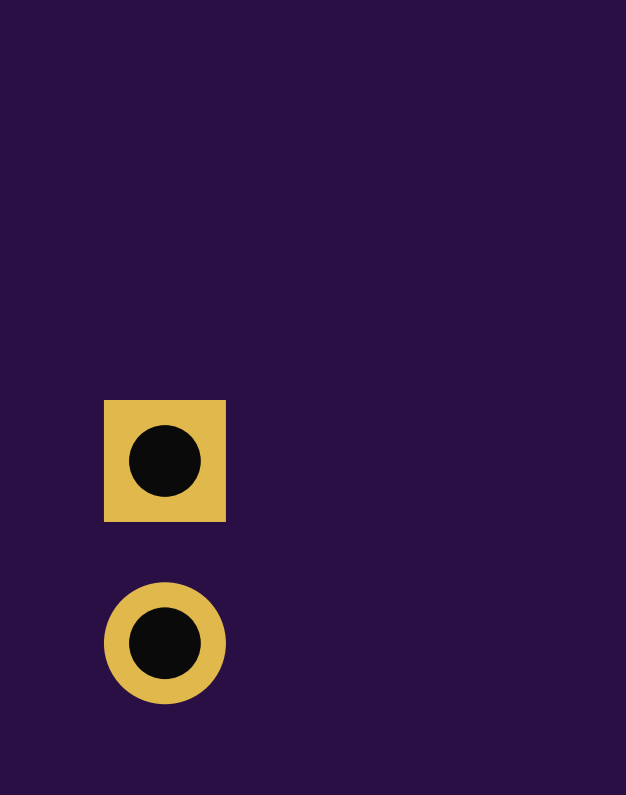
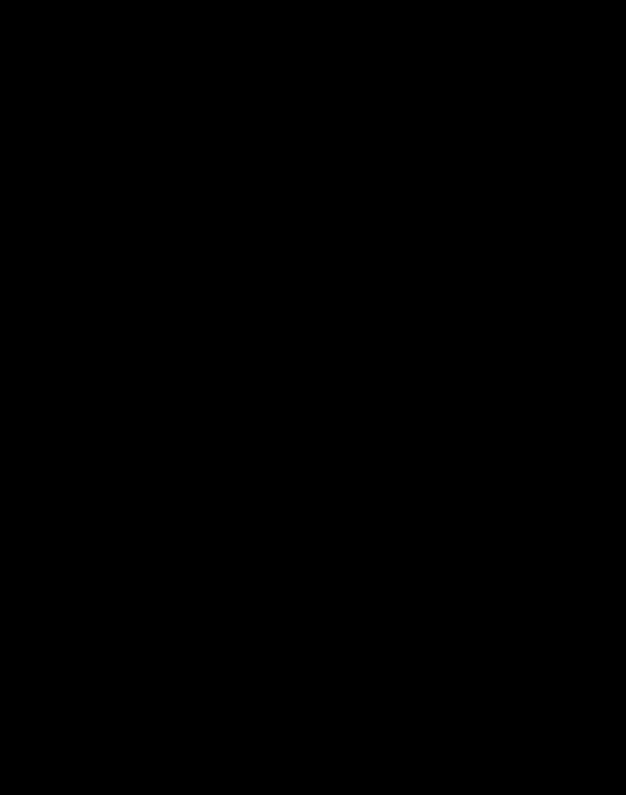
part: (164, 552) -> none

